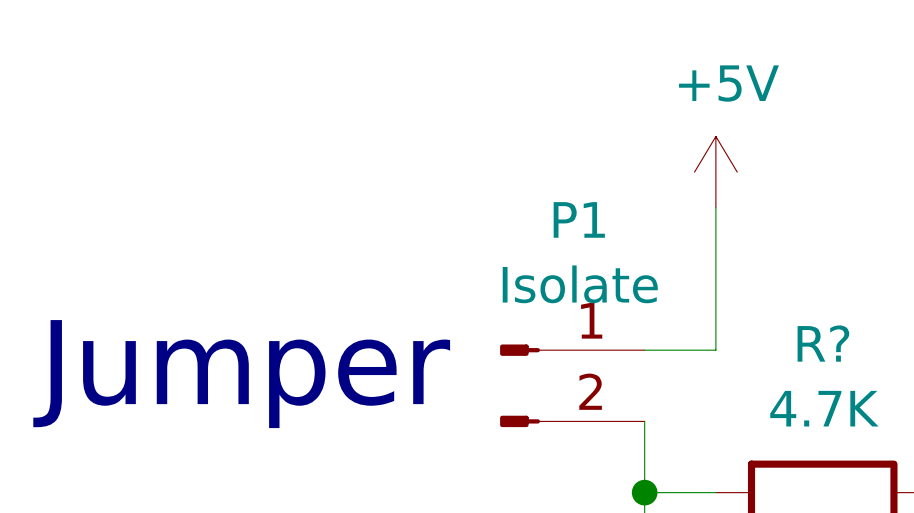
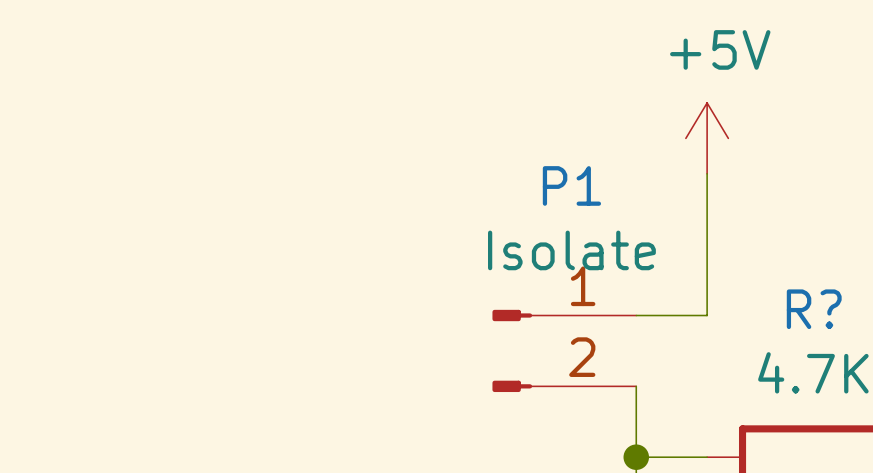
text: Jumper (241, 374) -> none

